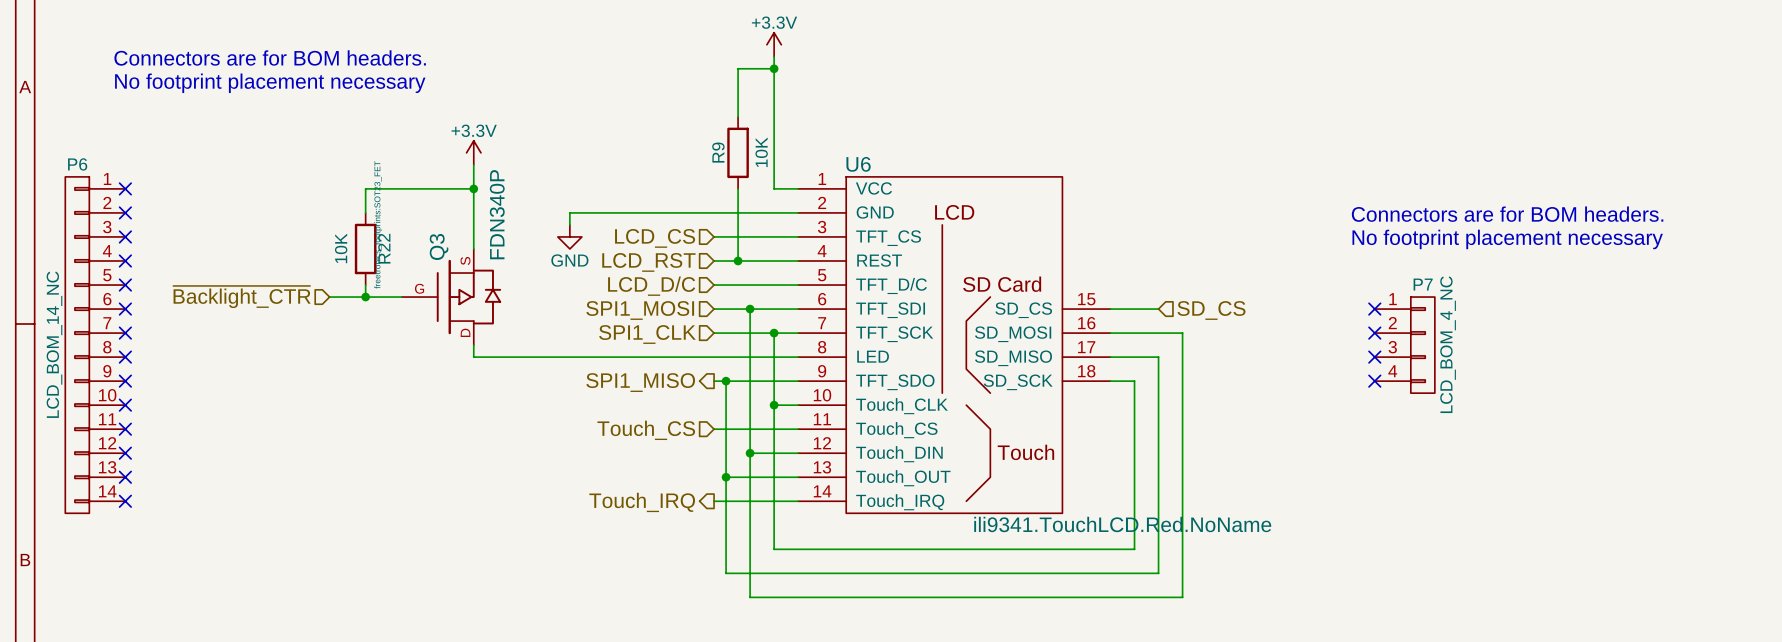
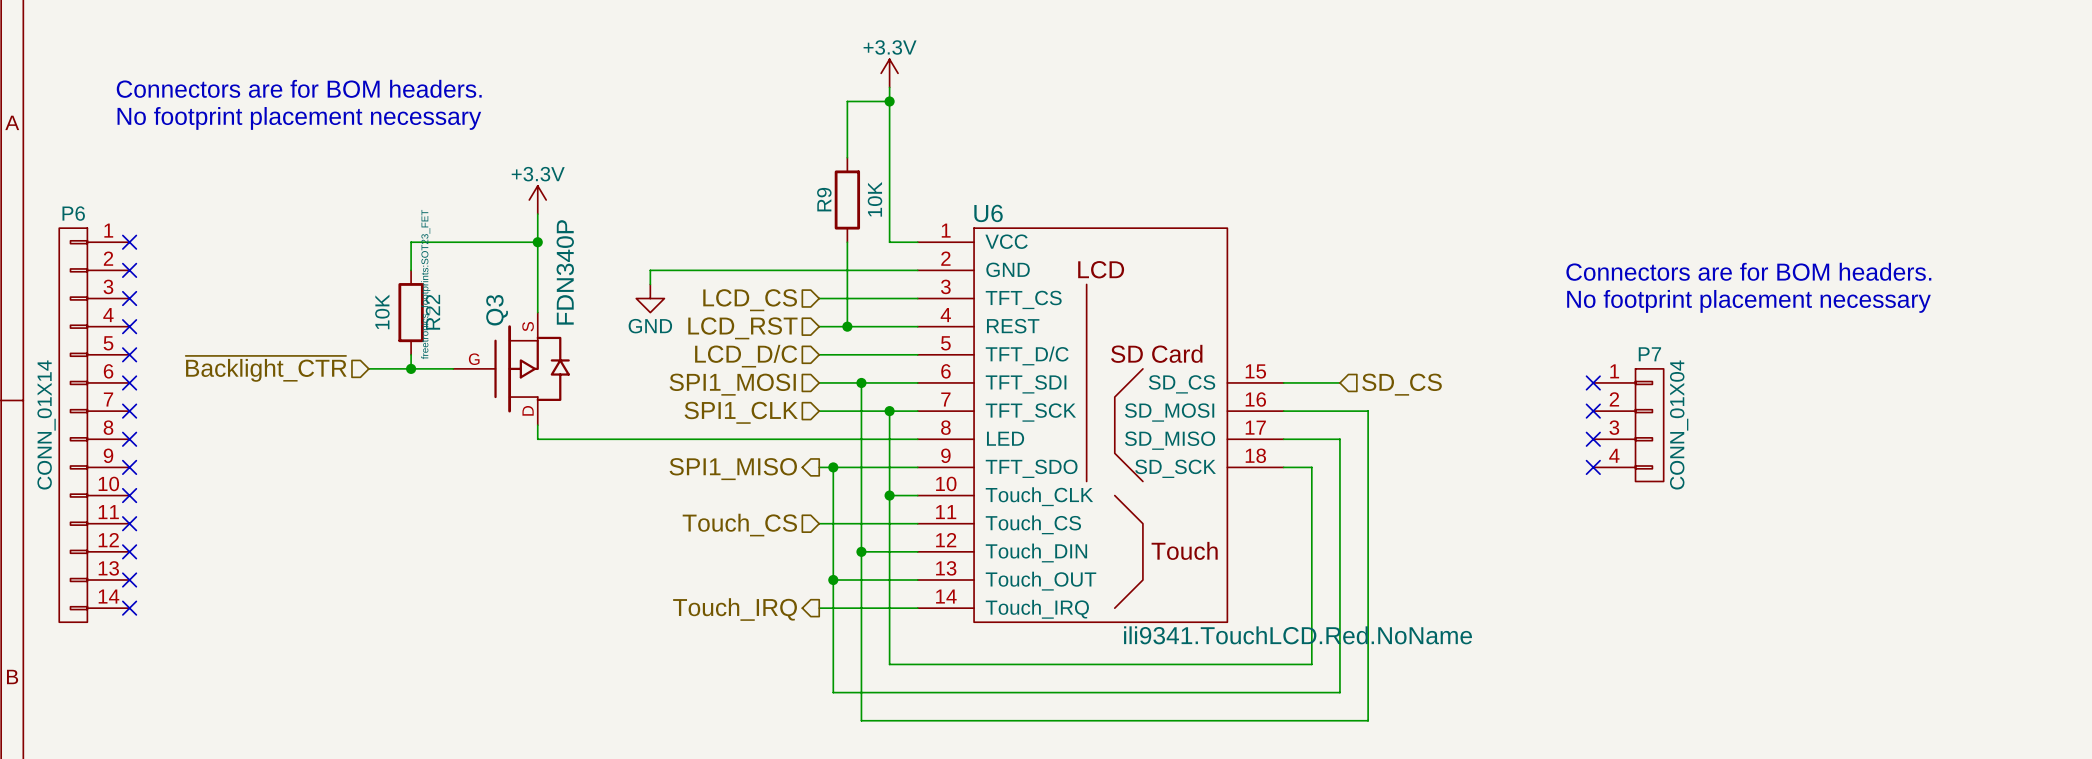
P6 value: LCD_BOM_14_NC (54, 344) -> CONN_01X14 (46, 424)
P7 value: LCD_BOM_4_NC (1448, 344) -> CONN_01X04 (1679, 424)

